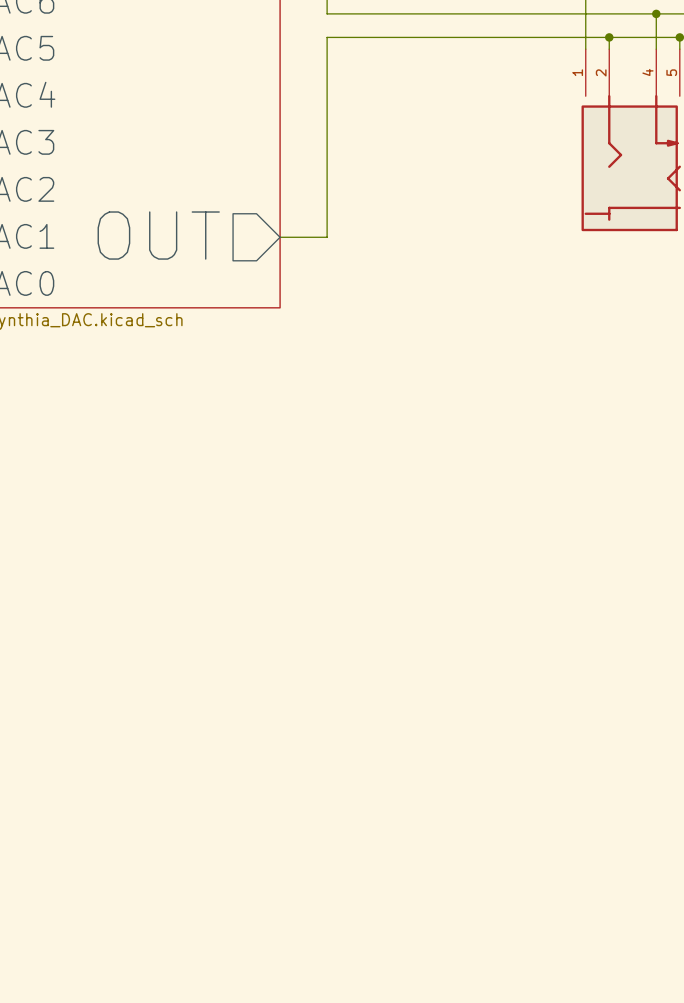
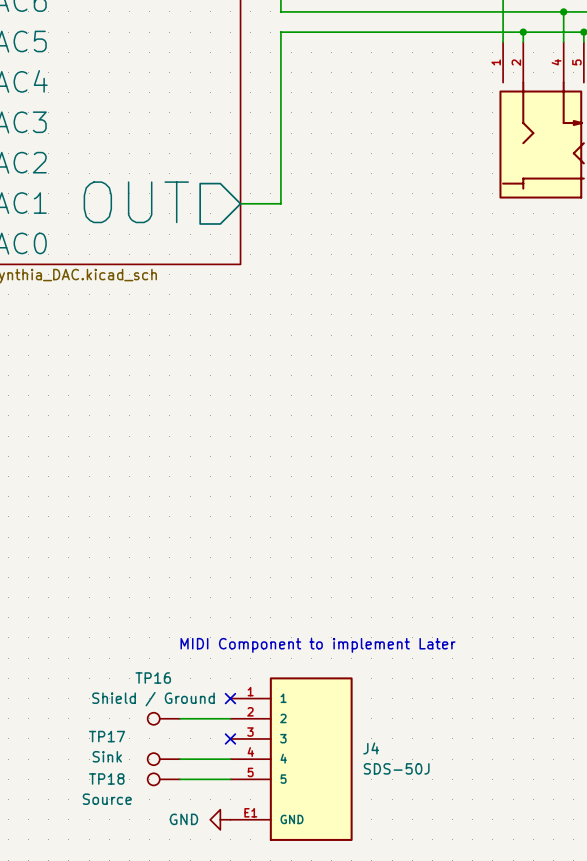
text: none -> MIDI Component to implement Later (318, 645)
no-connect mark: none -> (230, 698)
TP16: none -> Shield / Ground (163, 718)
wire: none -> (179, 718) (230, 718)
no-connect mark: none -> (230, 738)
TP17: none -> Sink (163, 759)
wire: none -> (179, 759) (230, 759)
J4: none -> SDS-50J (291, 759)
TP18: none -> Source (163, 779)
wire: none -> (179, 779) (230, 779)
power symbol: none -> GND (220, 819)

